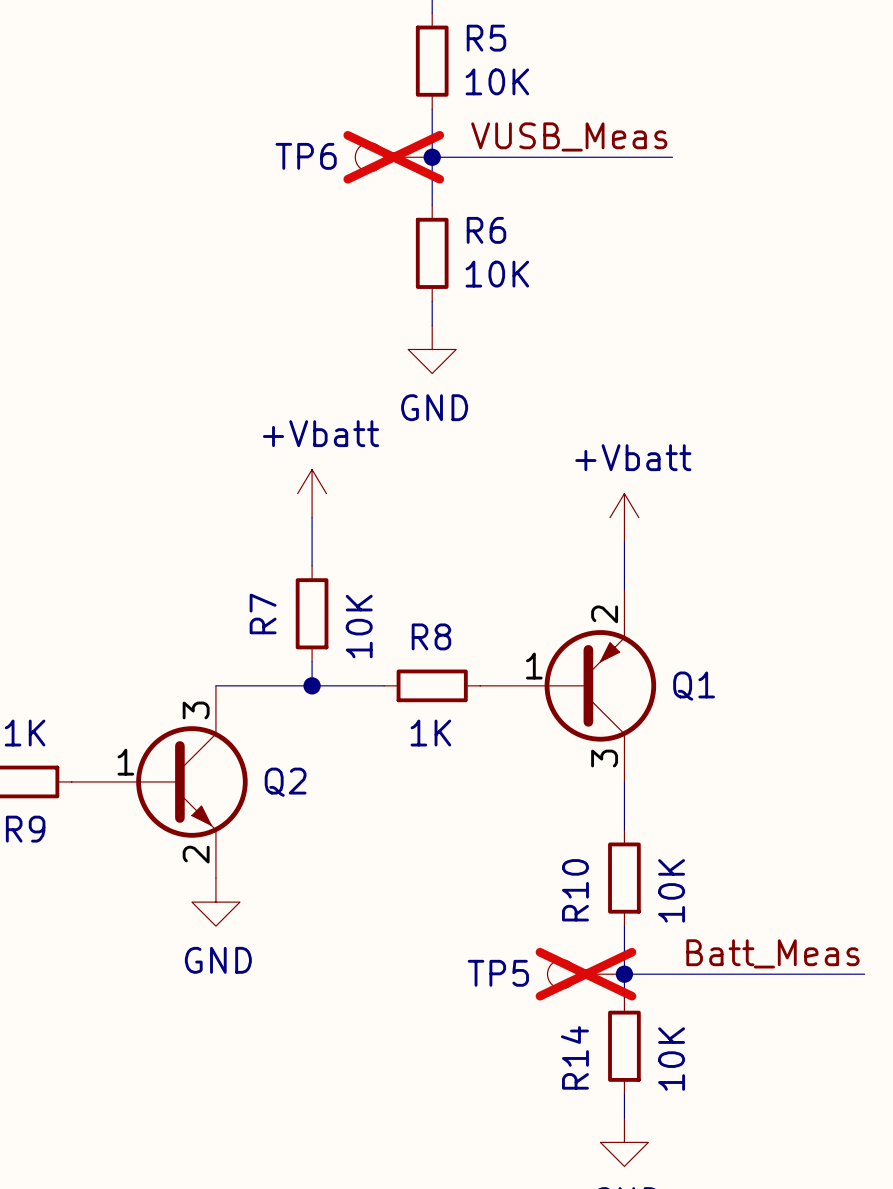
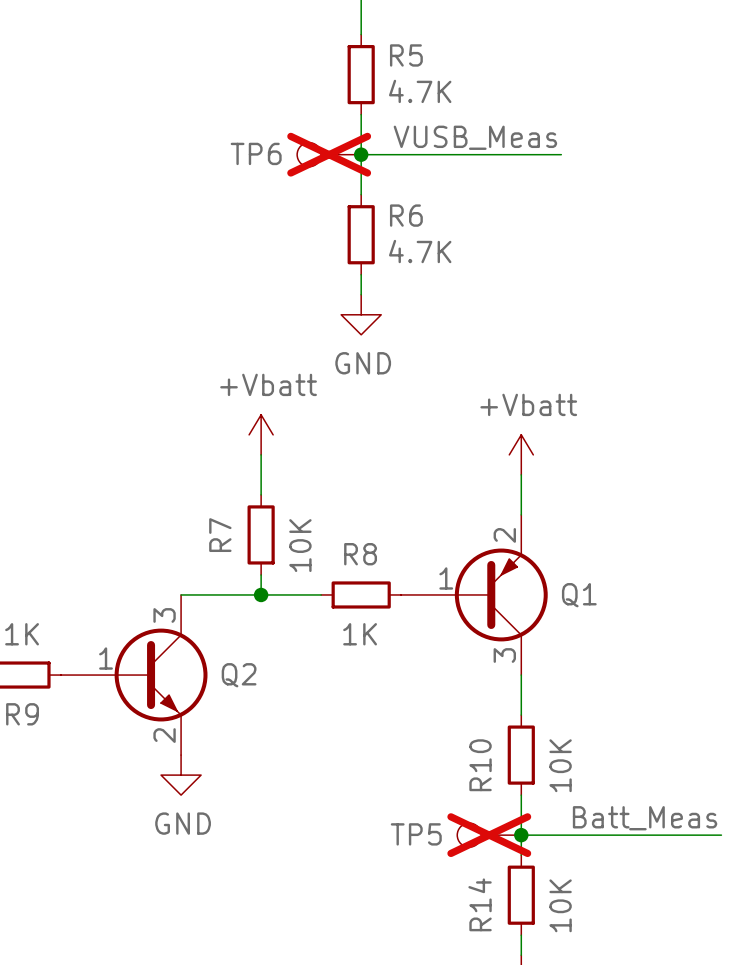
R5 value: 10K (497, 81) -> 4.7K (420, 91)
R6 value: 10K (497, 274) -> 4.7K (420, 251)

